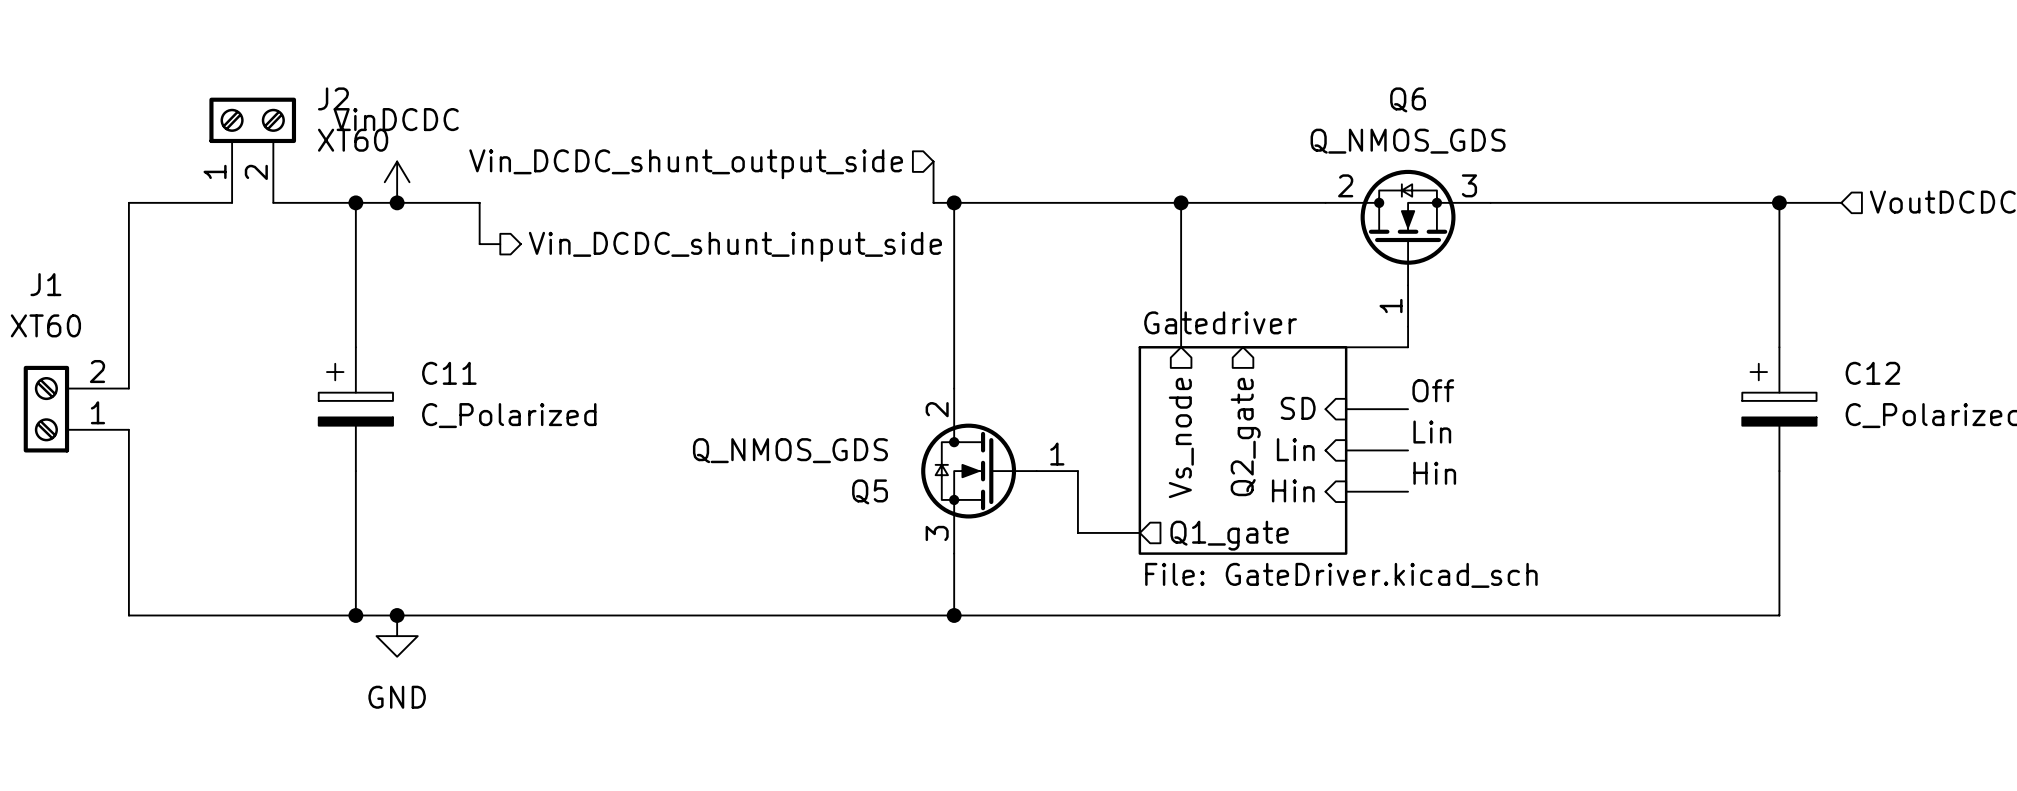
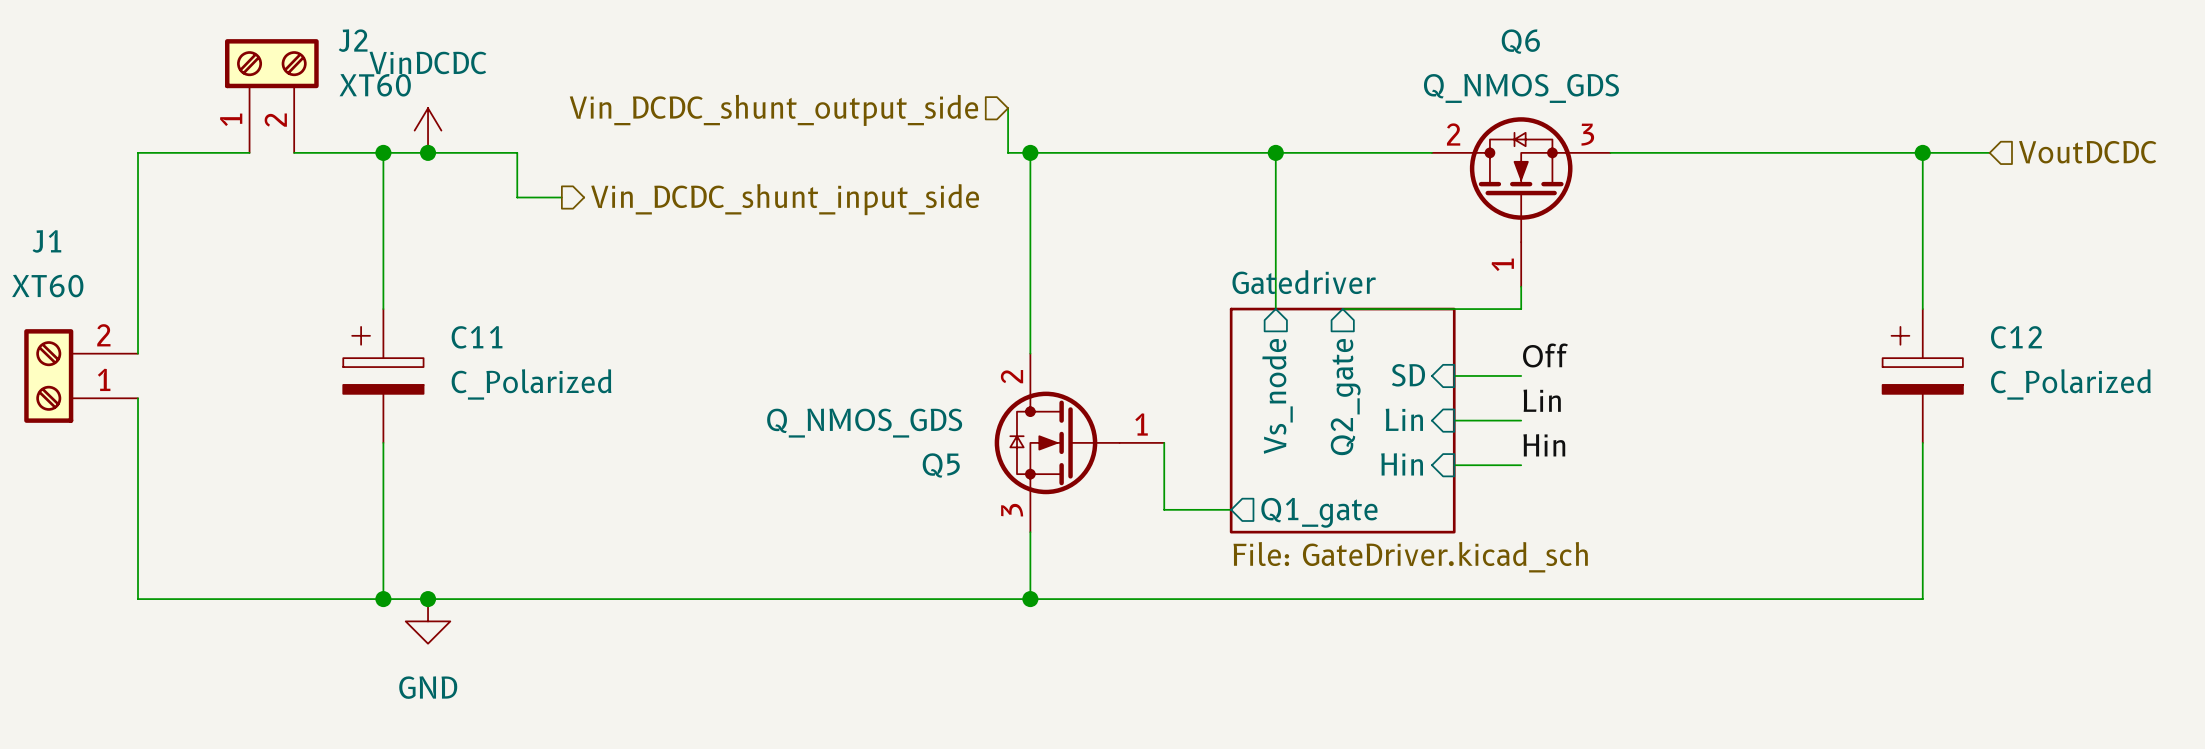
wire: none -> (539, 197) (561, 197)
hierarchical label position: Vin_DCDC_shunt_input_side (735, 246) -> Vin_DCDC_shunt_input_side (785, 199)

